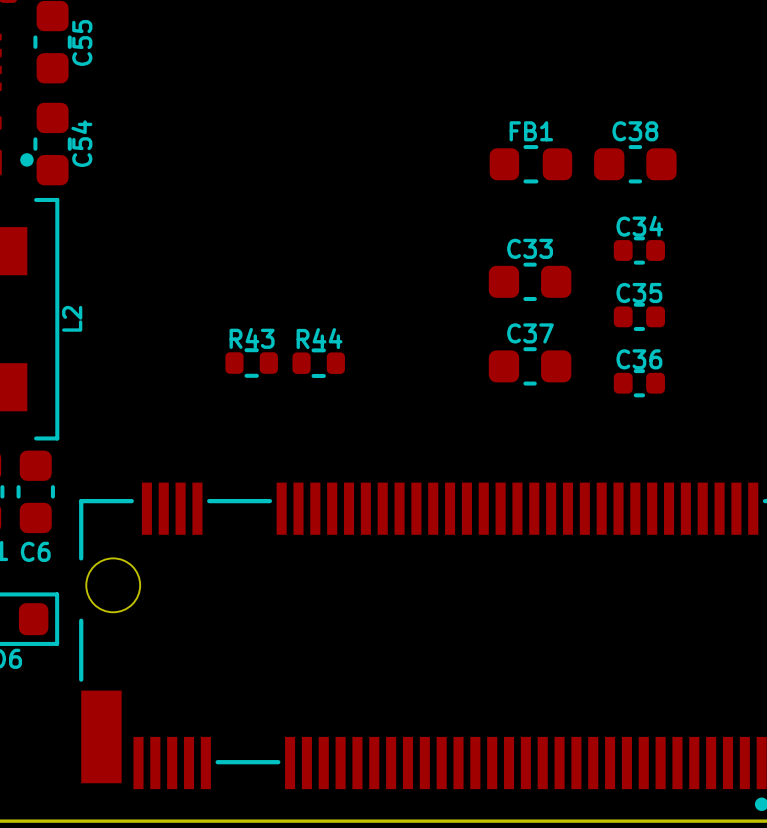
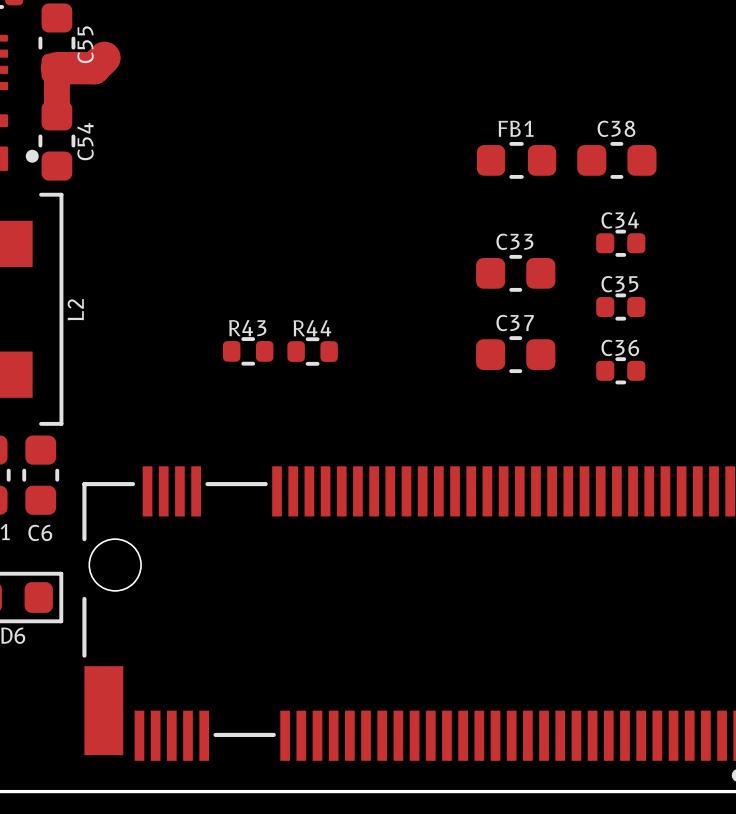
track: none -> (104, 57) (94, 68) (56, 68) (56, 115)

